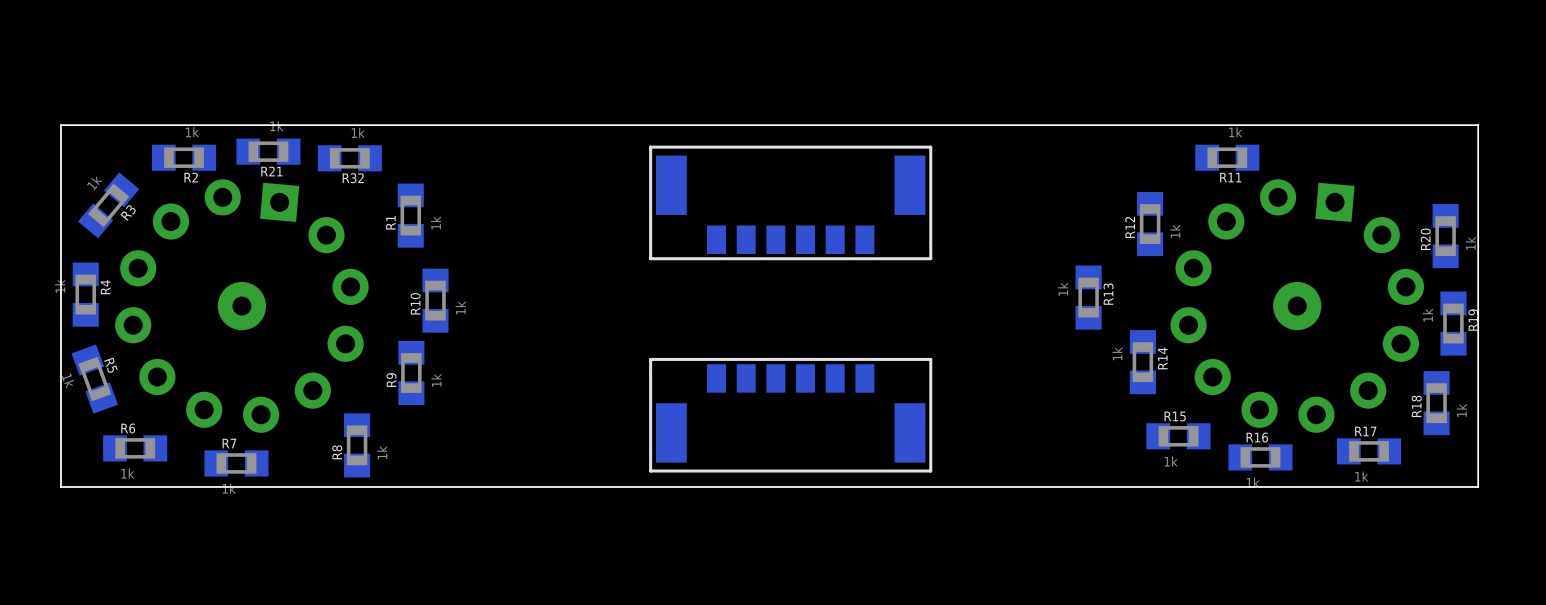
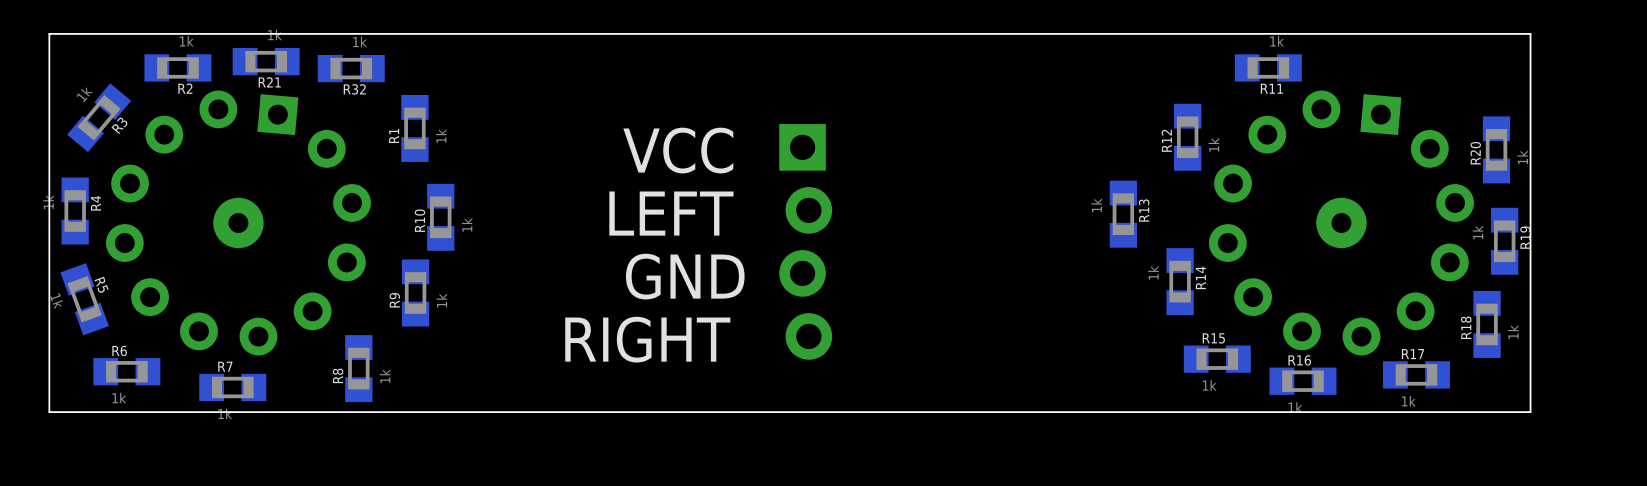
part: (790, 202) -> none
text: none -> VCC (678, 150)
text: none -> LEFT (671, 213)
part: none -> (805, 241)
text: none -> GND (685, 276)
part: (790, 415) -> none
text: none -> RIGHT (647, 339)

